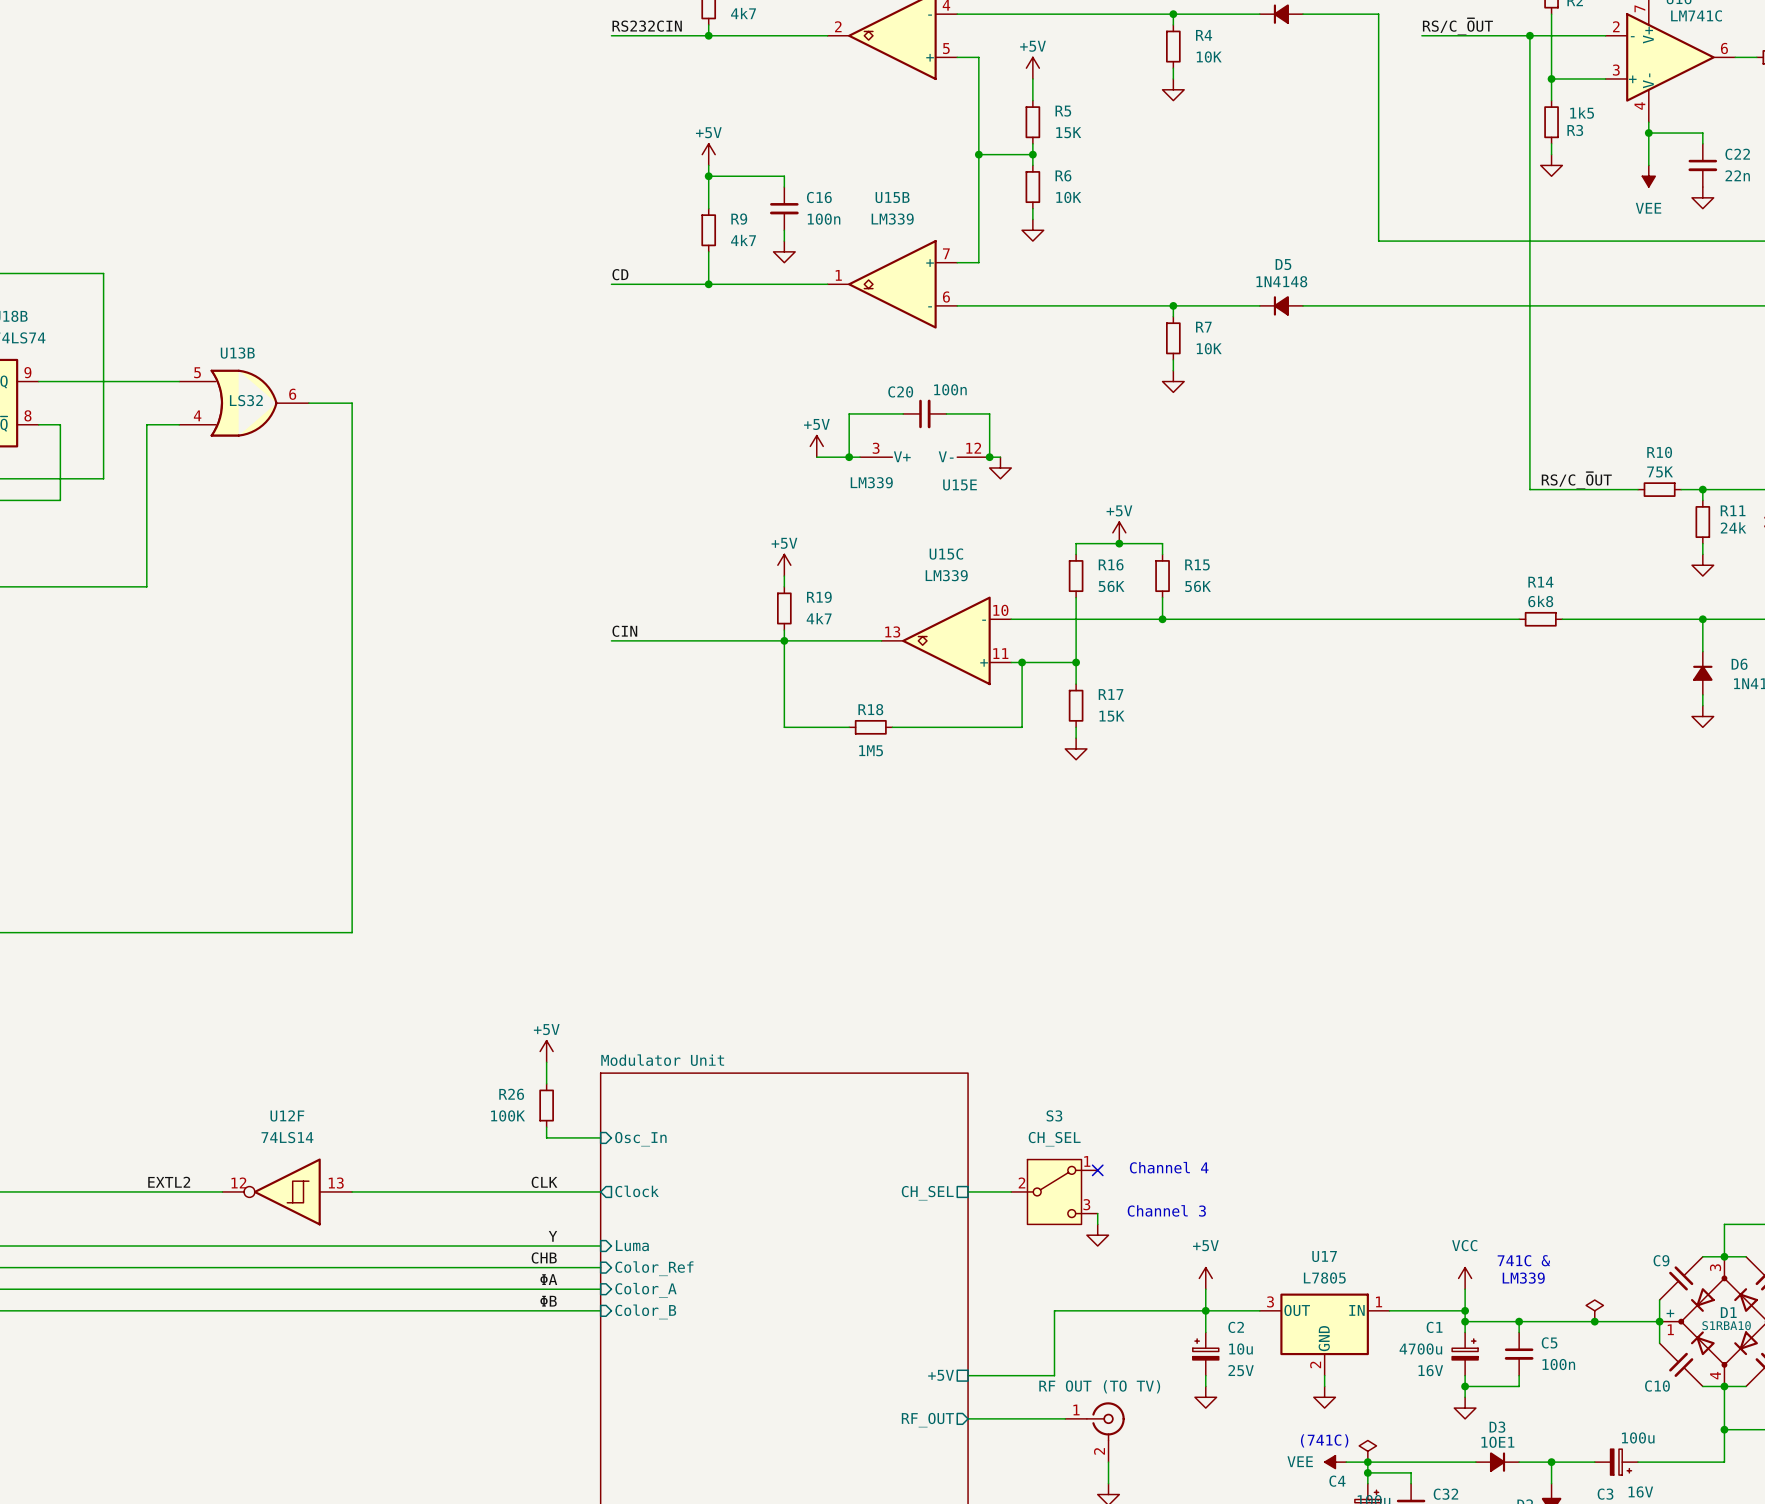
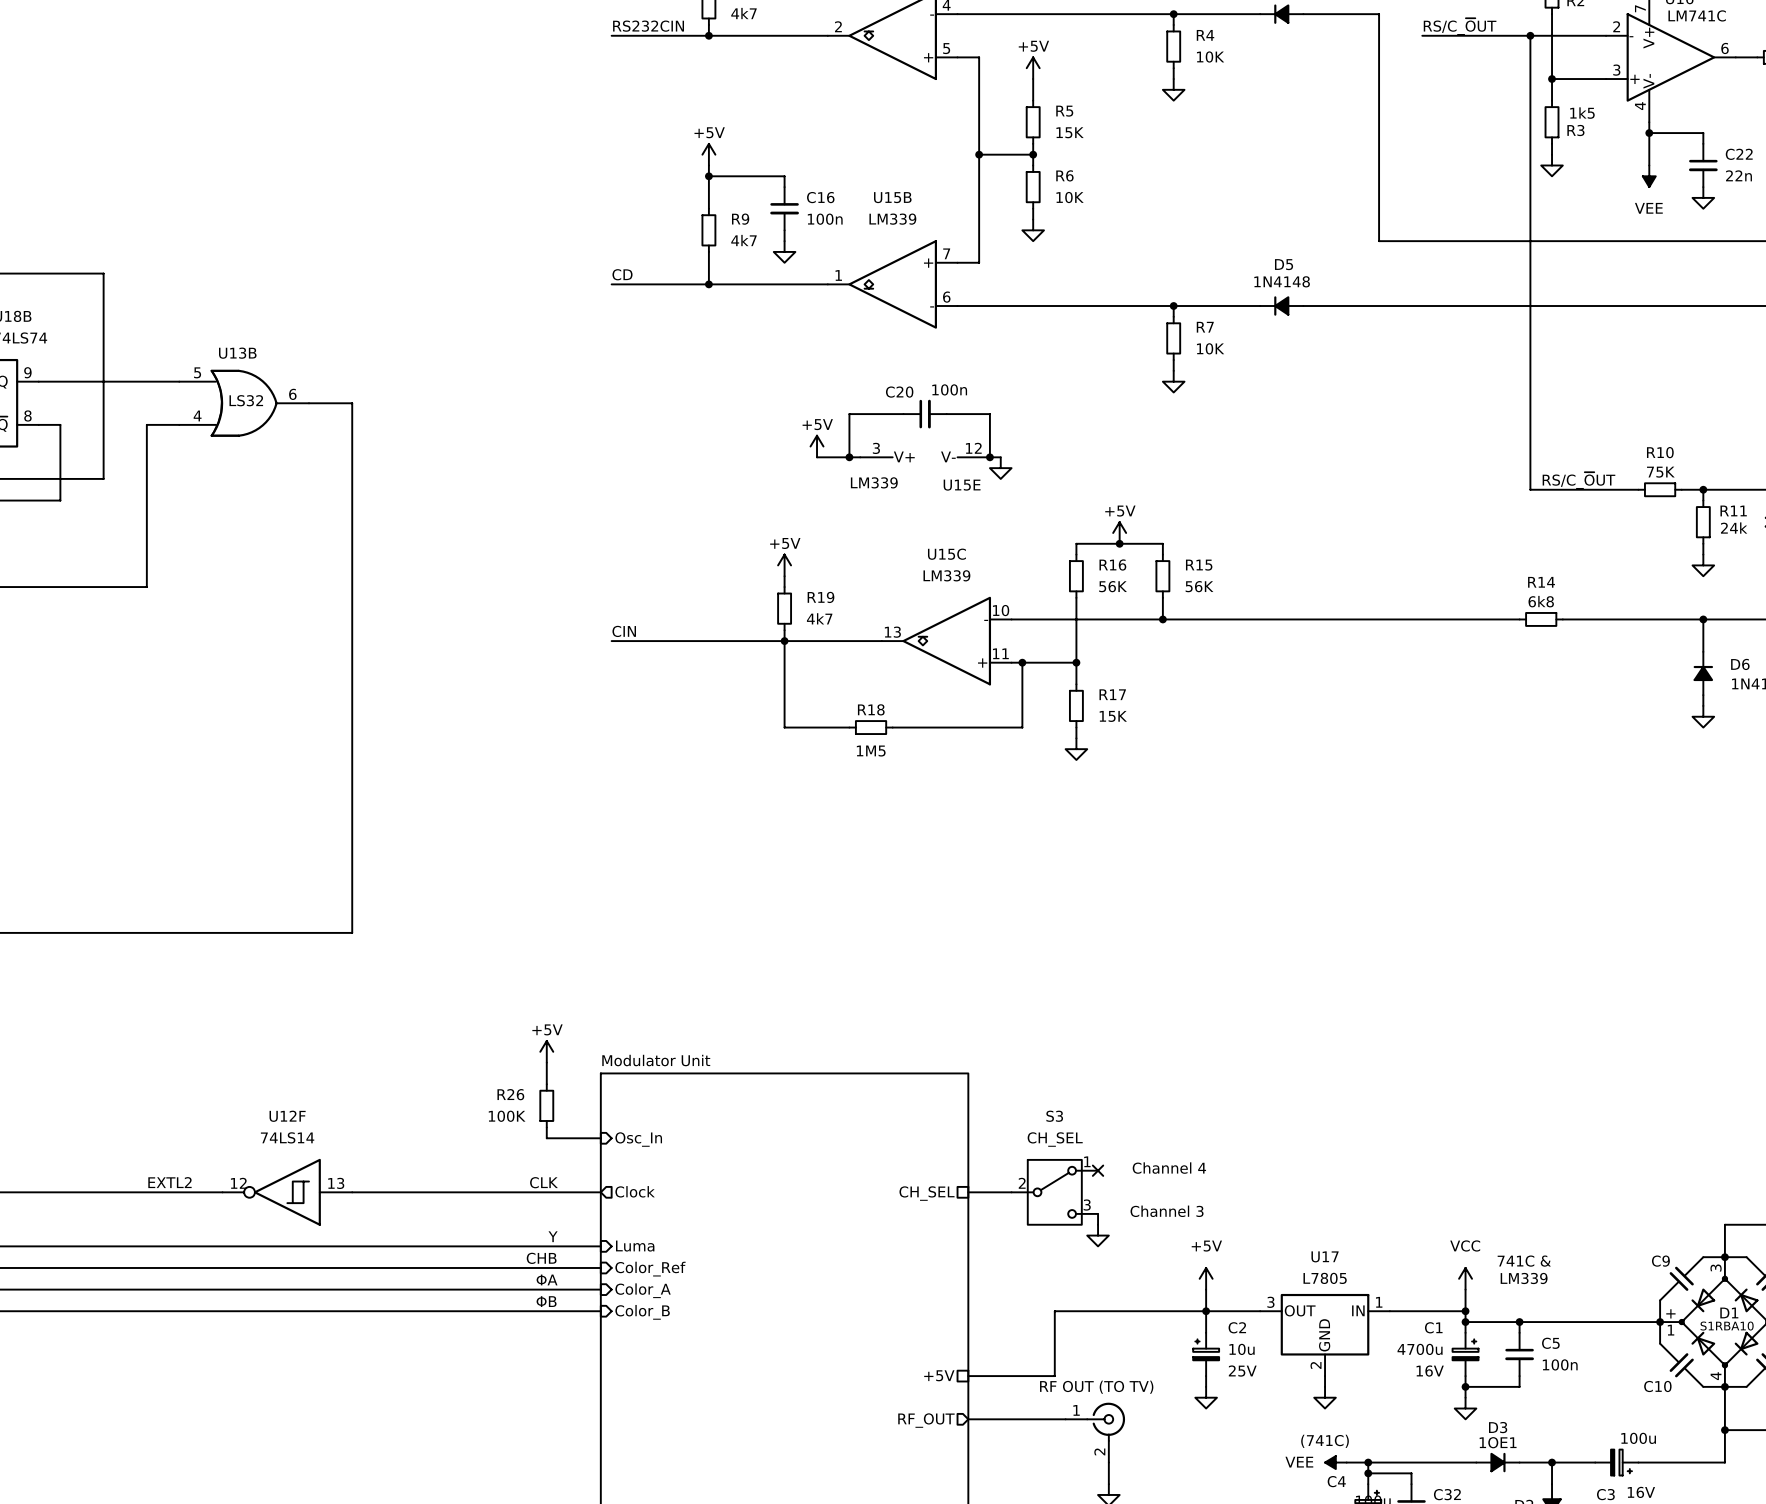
power symbol: (1594, 1310) -> none
junction: (1594, 1321) -> none
power symbol: (1367, 1451) -> none

